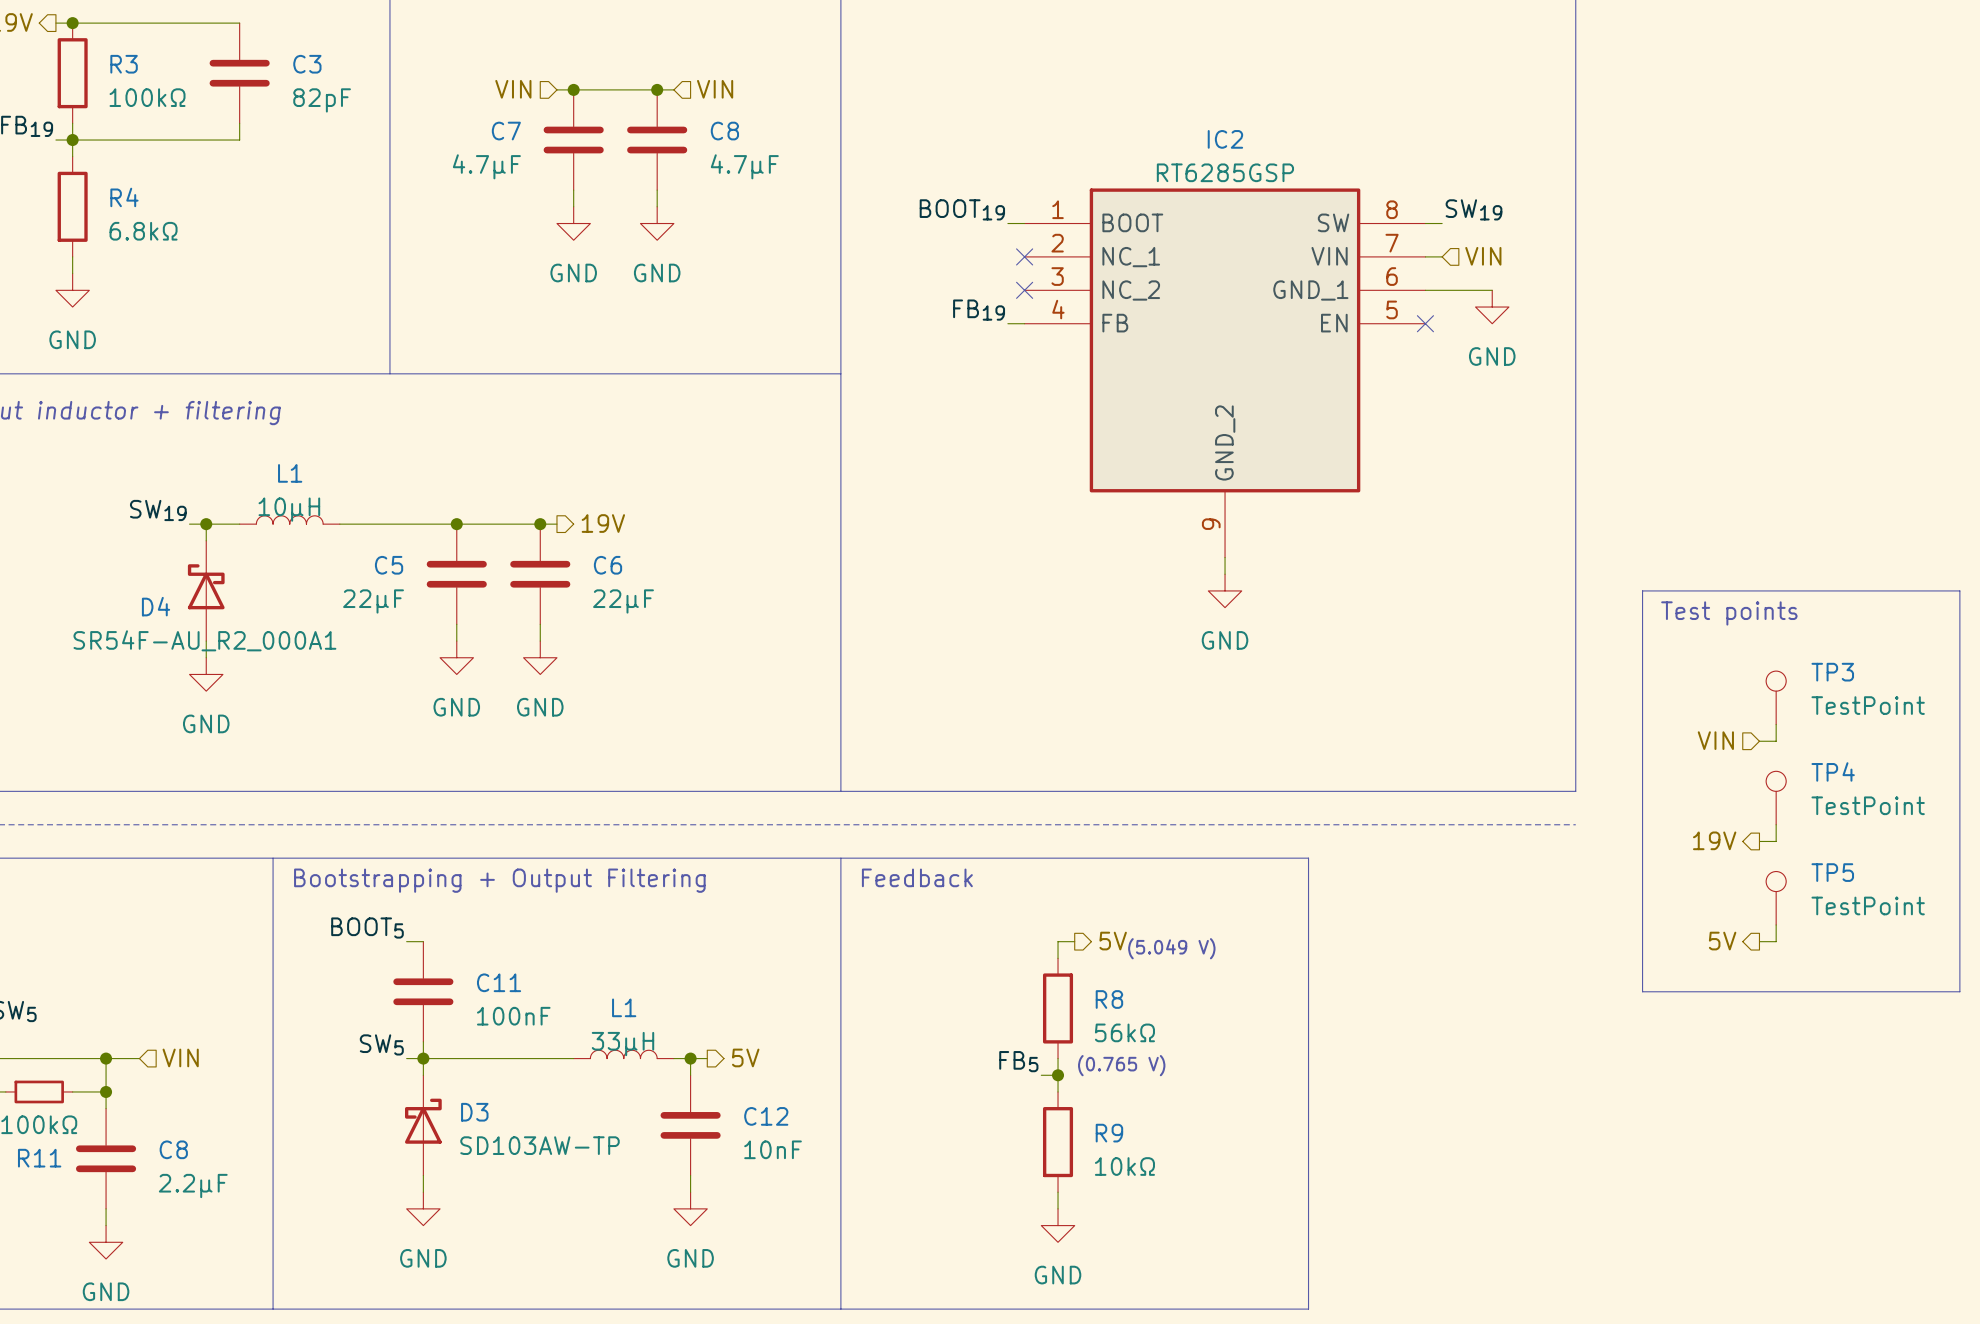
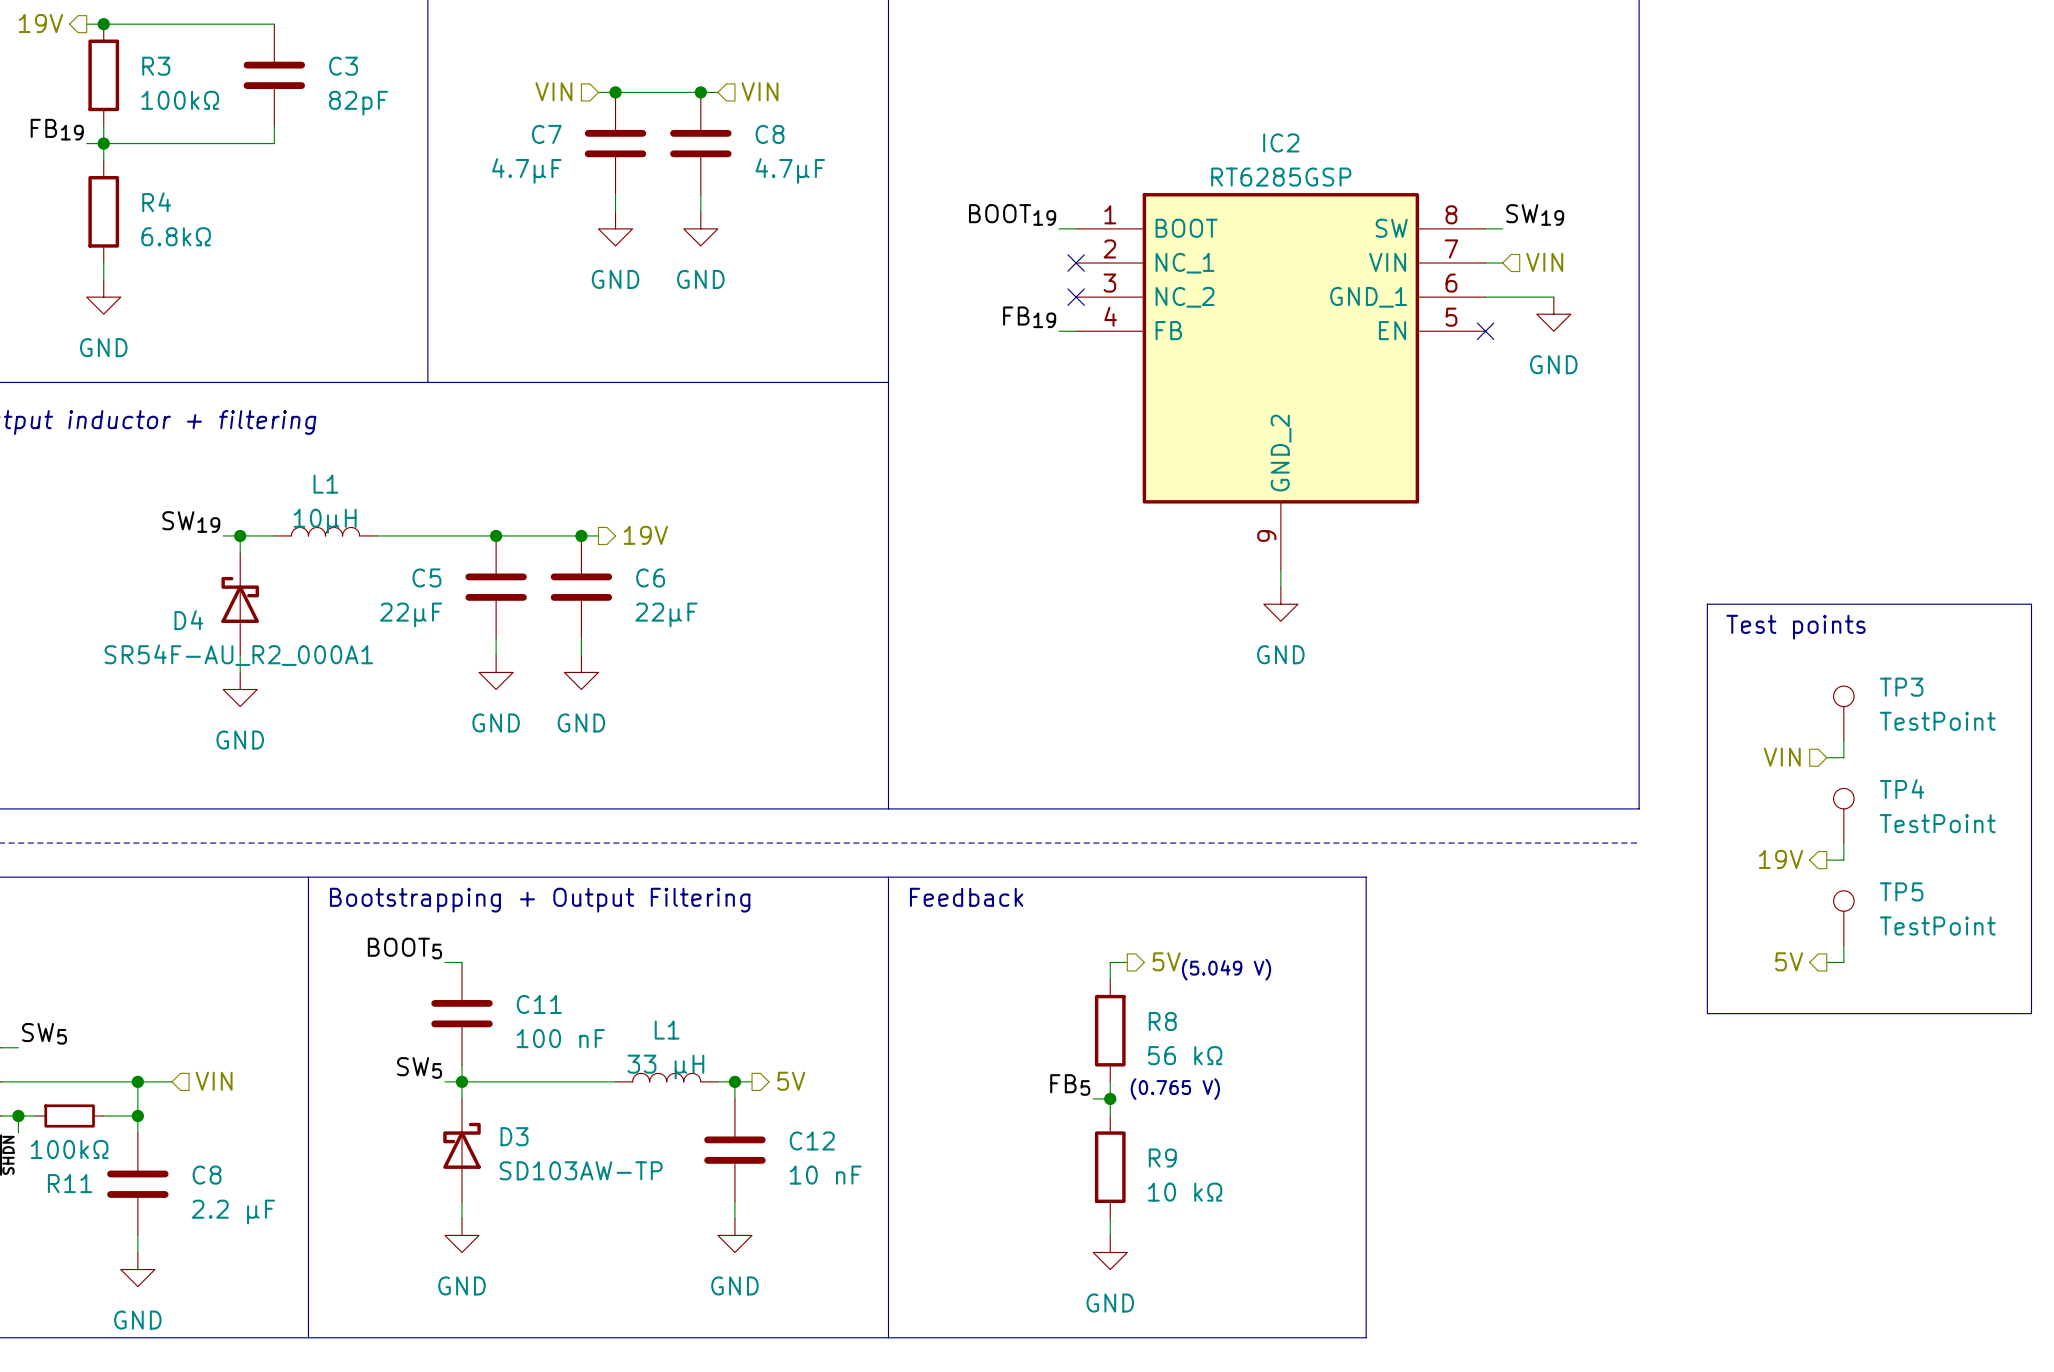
C11 value: 100nF (513, 1016) -> 100 nF (560, 1038)
R8 value: 56kΩ (1124, 1032) -> 56 kΩ (1185, 1055)
L1 value: 33μH (622, 1044) -> 33 μH (665, 1067)
C12 value: 10nF (773, 1149) -> 10 nF (825, 1175)
R9 value: 10kΩ (1124, 1166) -> 10 kΩ (1185, 1192)
C8 value: 2.2μF (193, 1185) -> 2.2 μF (233, 1212)

